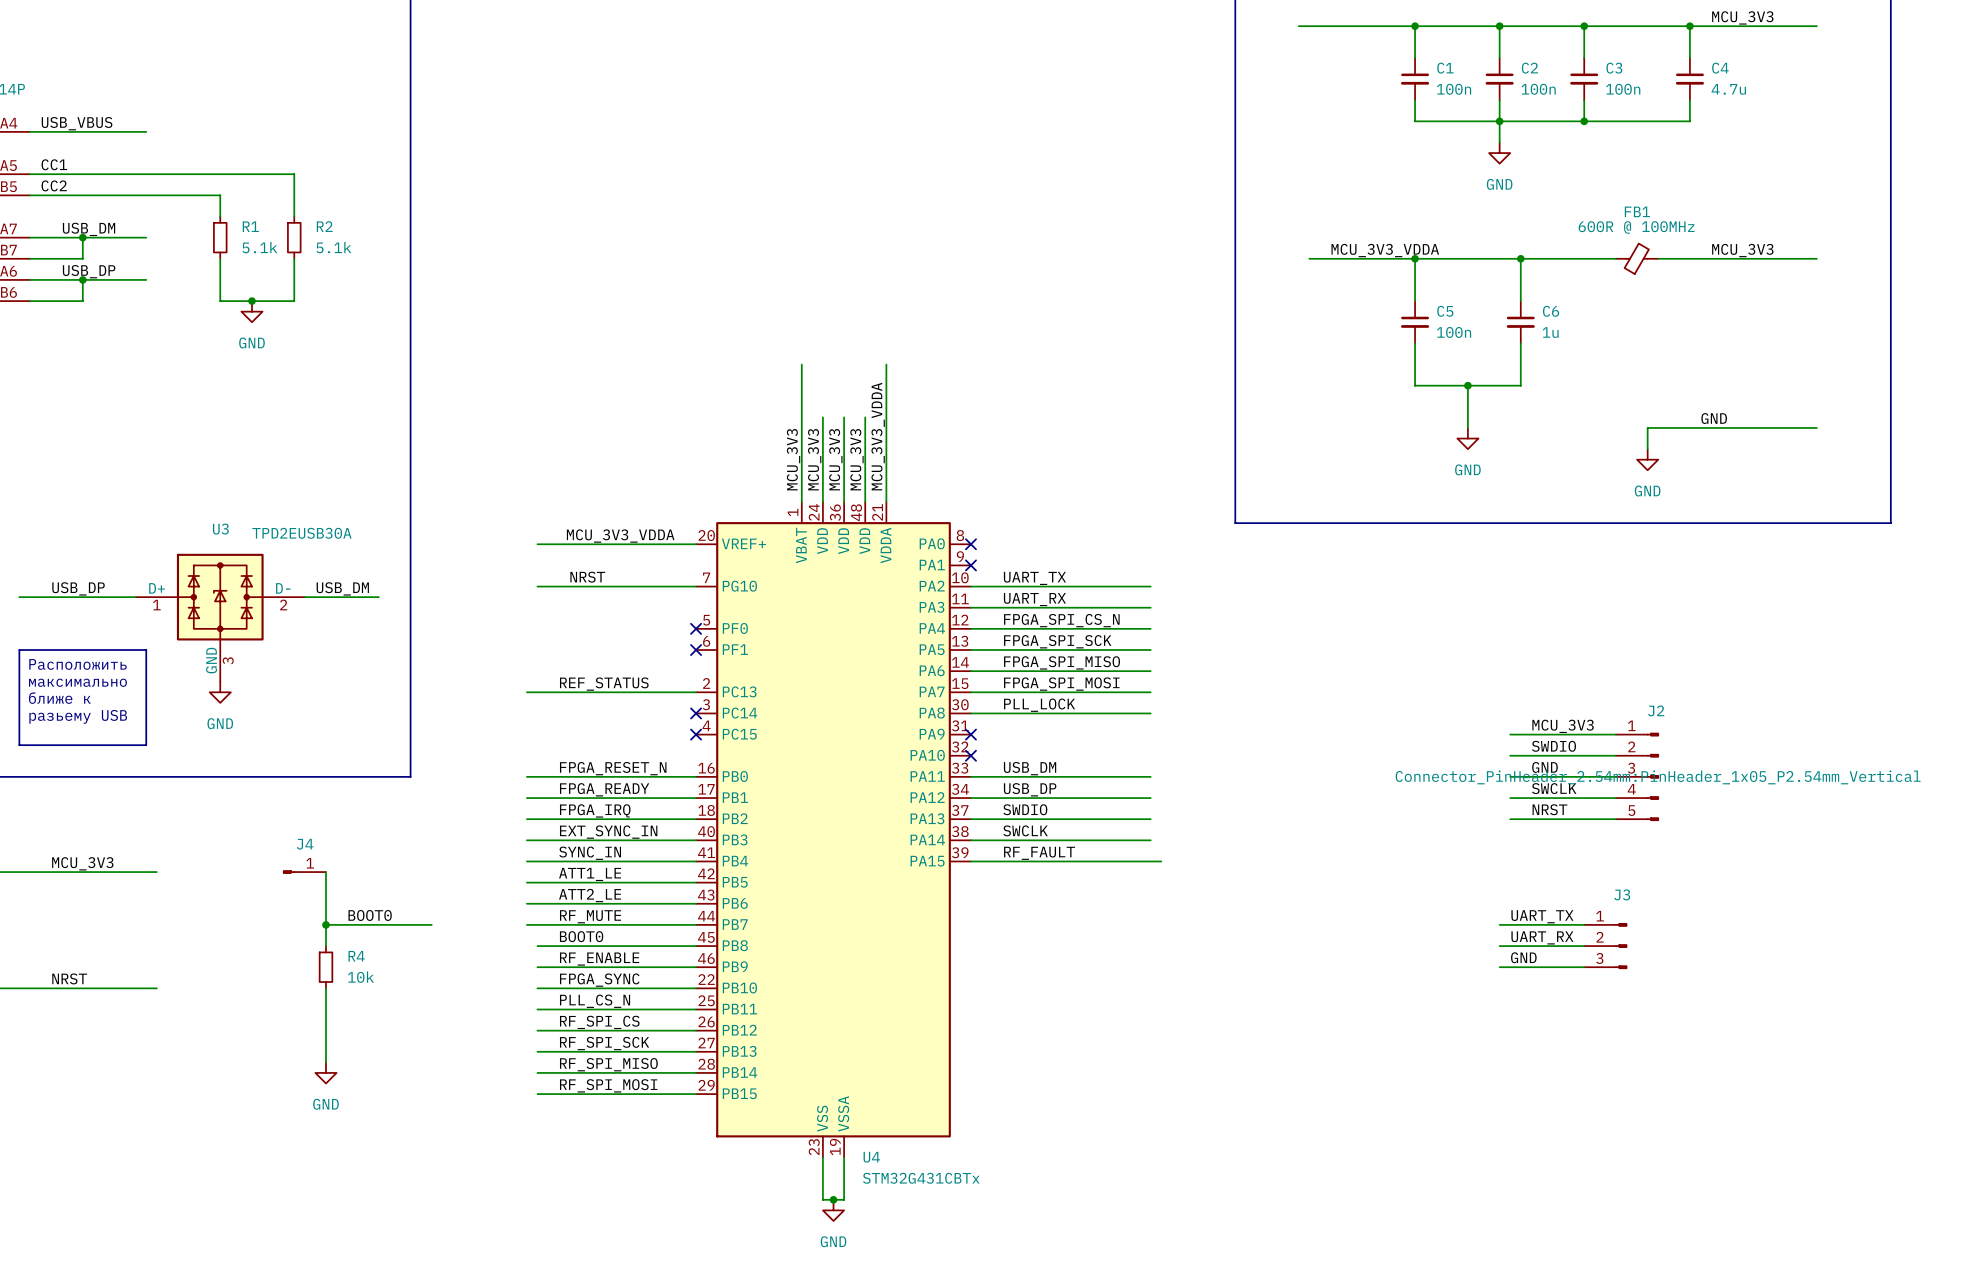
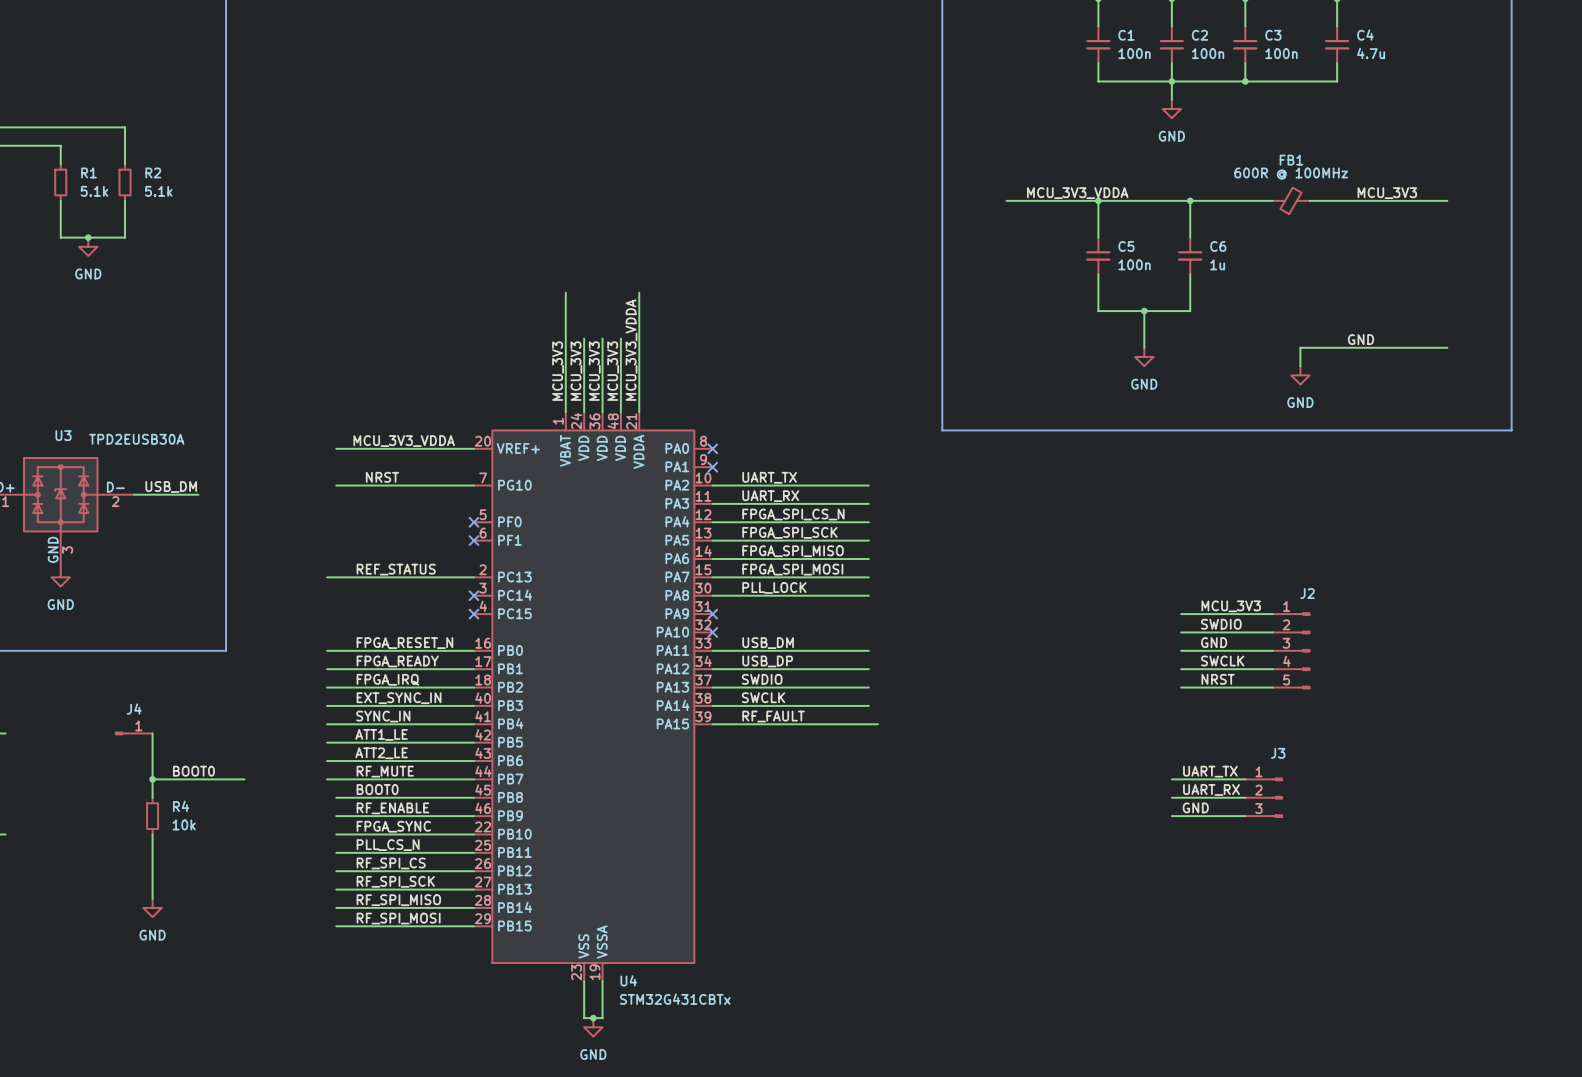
J2 text: Connector_PinHeader_2.54mm:PinHeader_1x05_P2.54mm_Vertical (1658, 777) -> none

